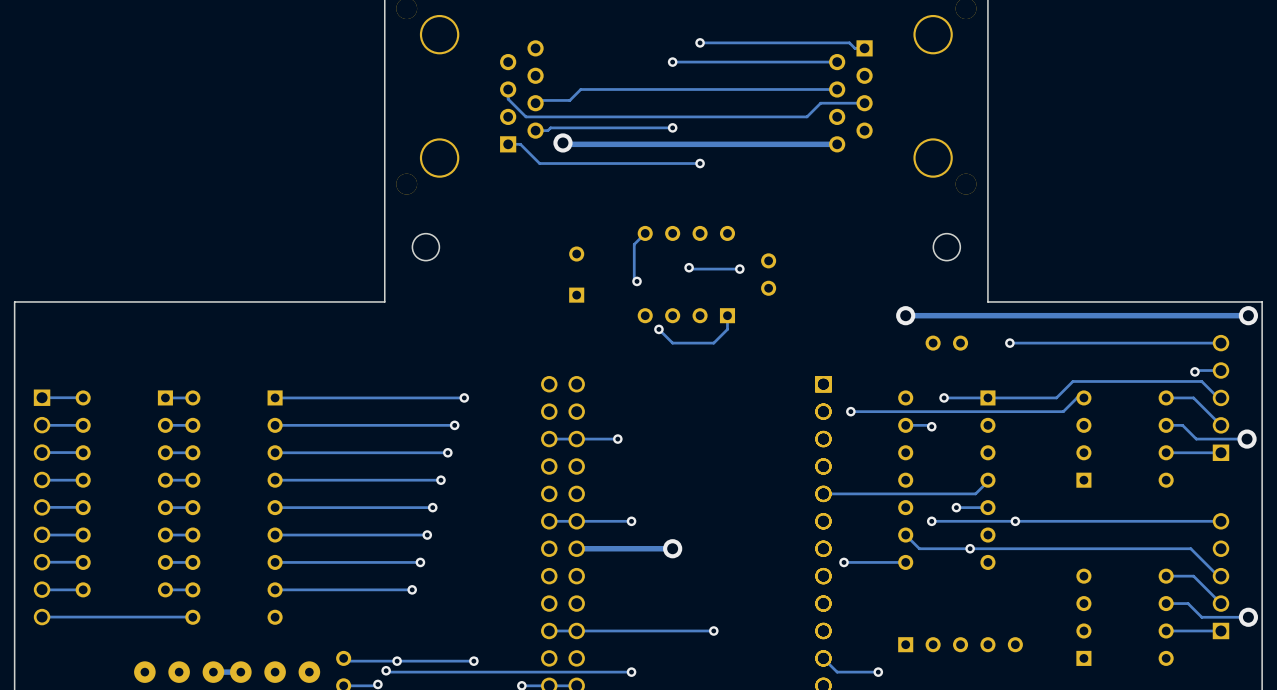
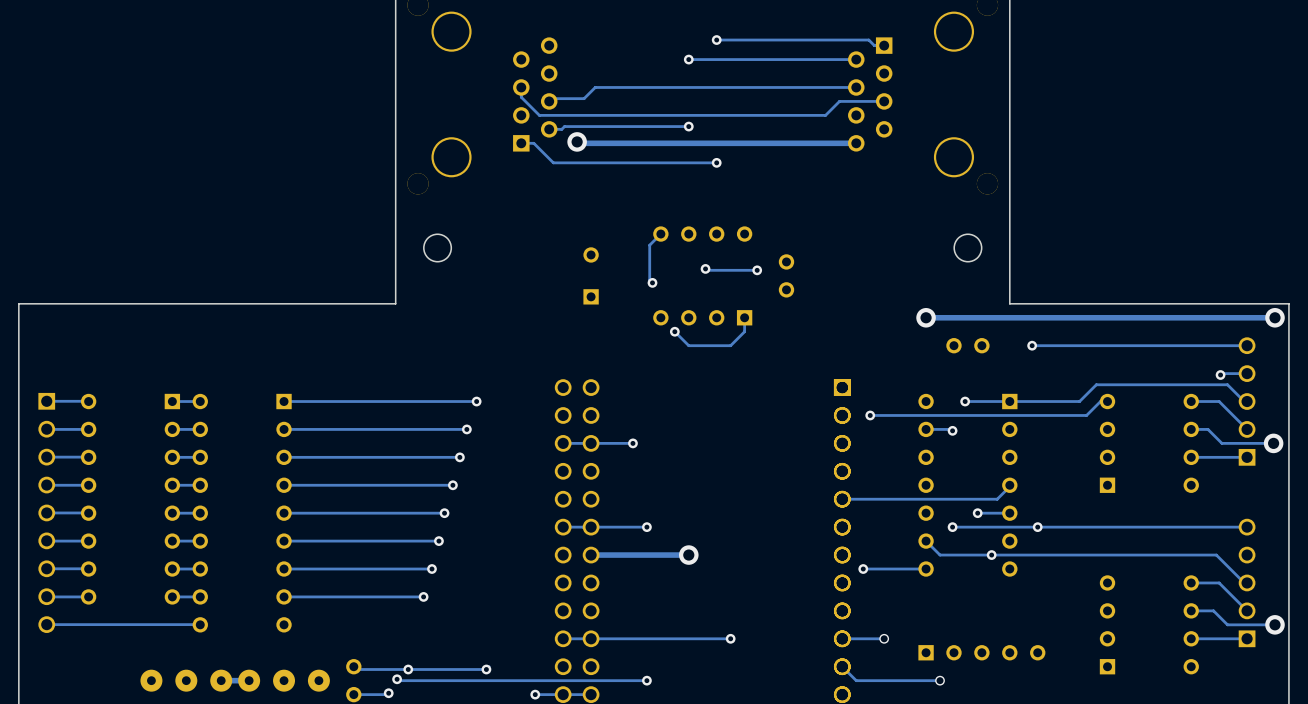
track: none -> (884, 638) (842, 638)
via: none -> (884, 638)
via: (878, 672) -> none
track: none -> (940, 680) (898, 680)
via: none -> (940, 680)

